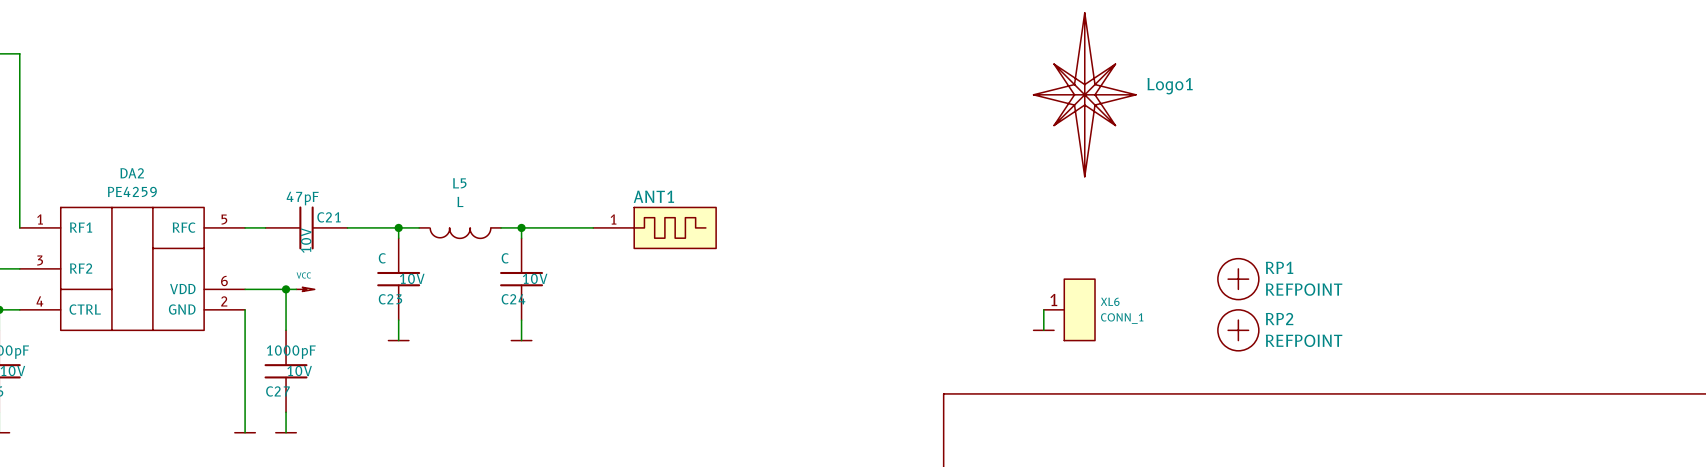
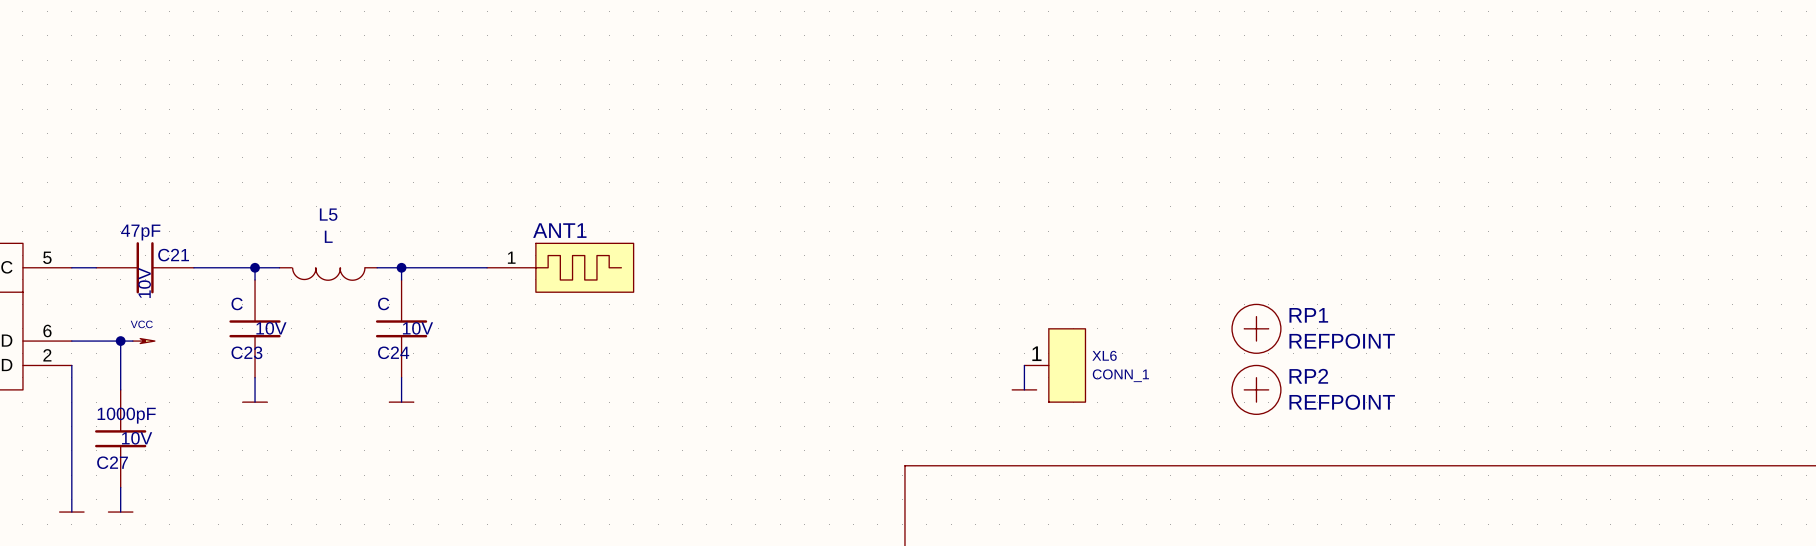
Logo1: (1084, 94) -> none

